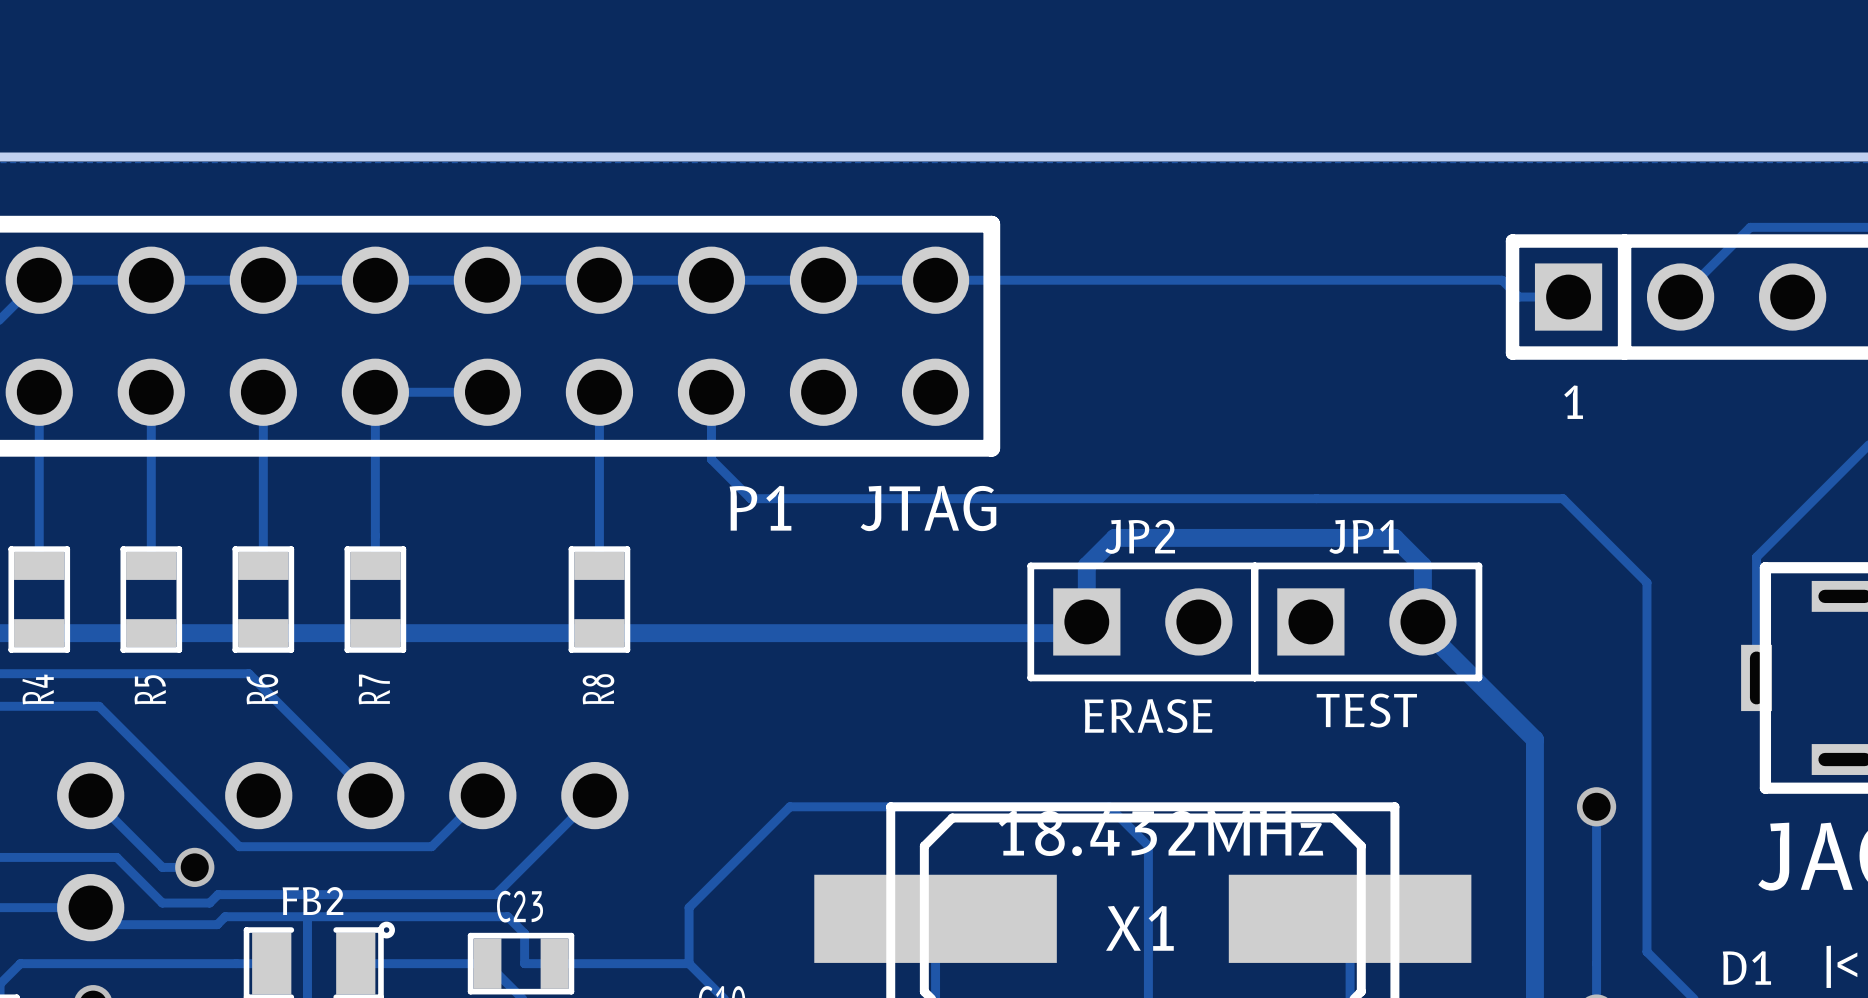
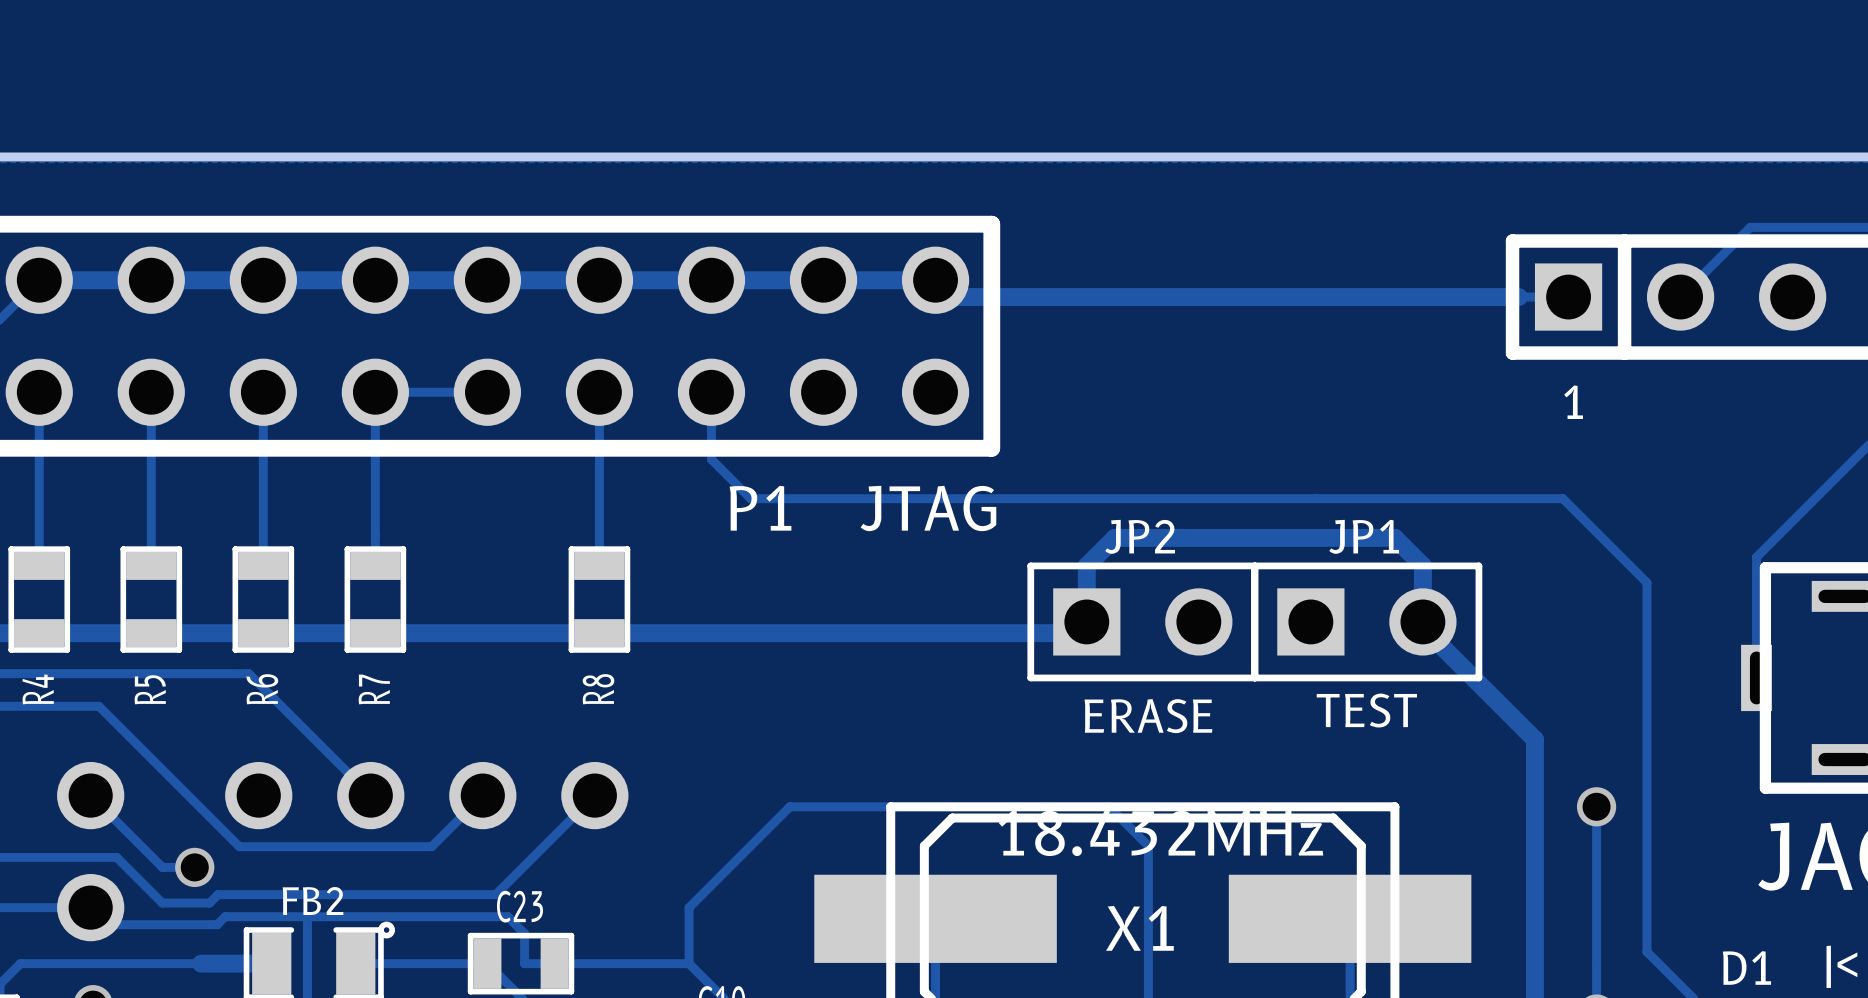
track: (935, 280) (1502, 280) (1518, 297) -> (39, 280) (935, 280) (952, 297) (1518, 297)
track width: thin (201, 963) (271, 963) -> thick (201, 963) (271, 963)

